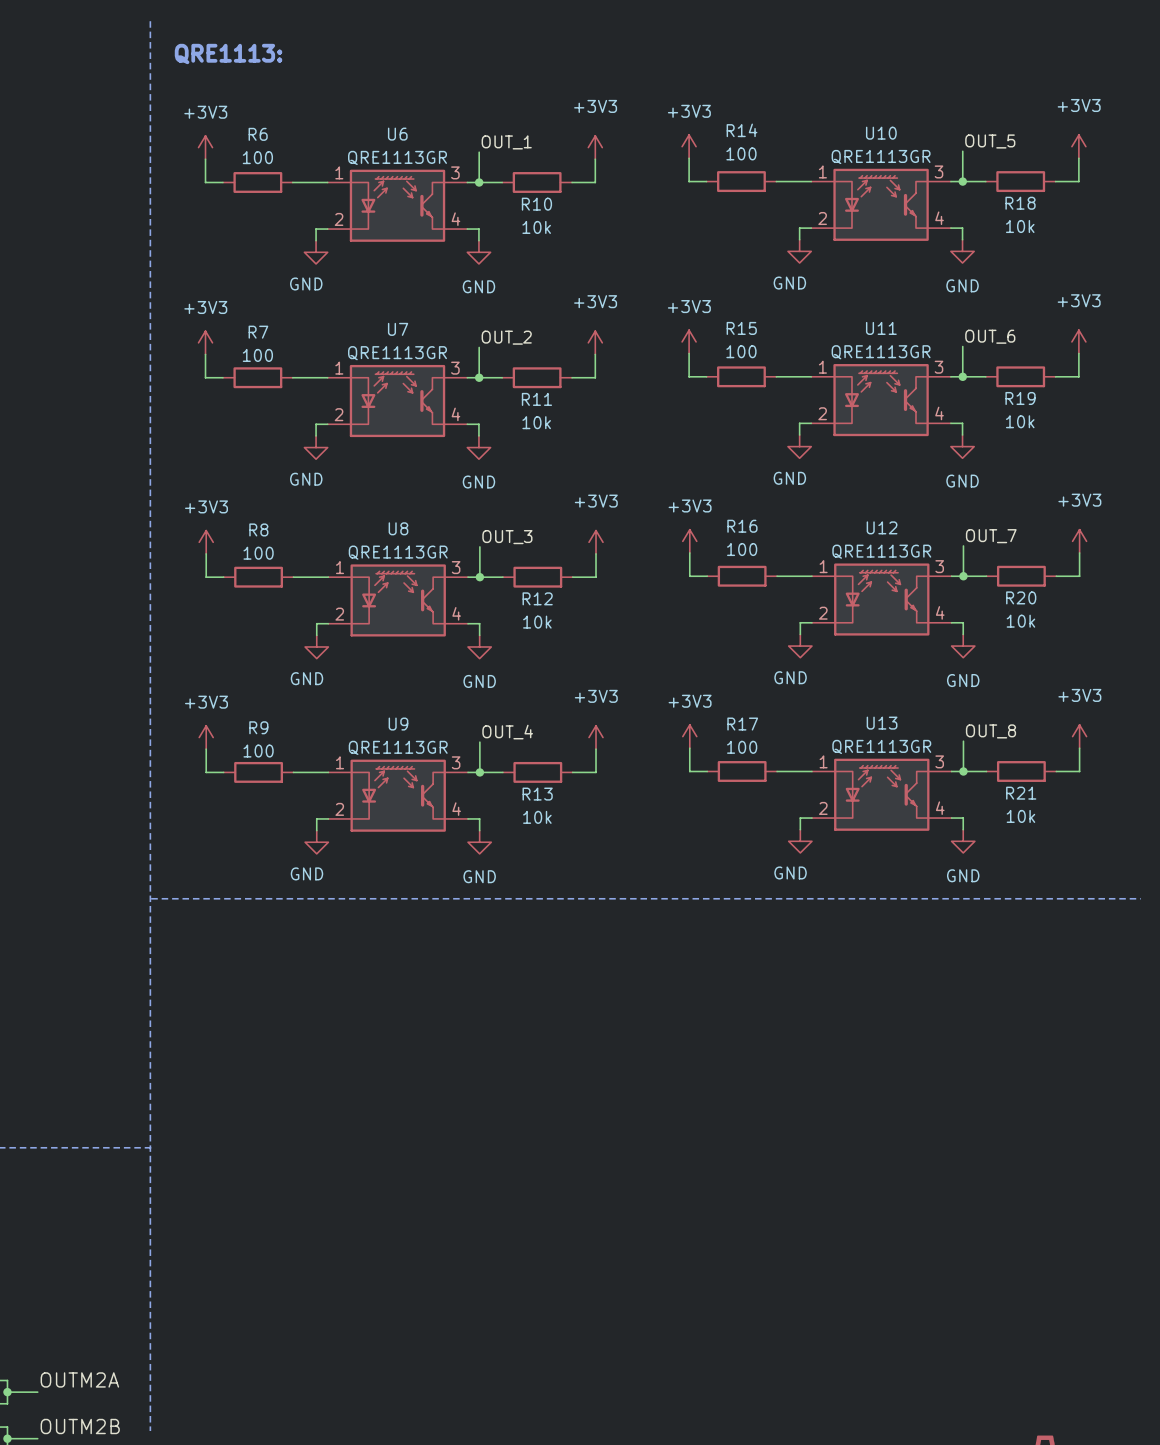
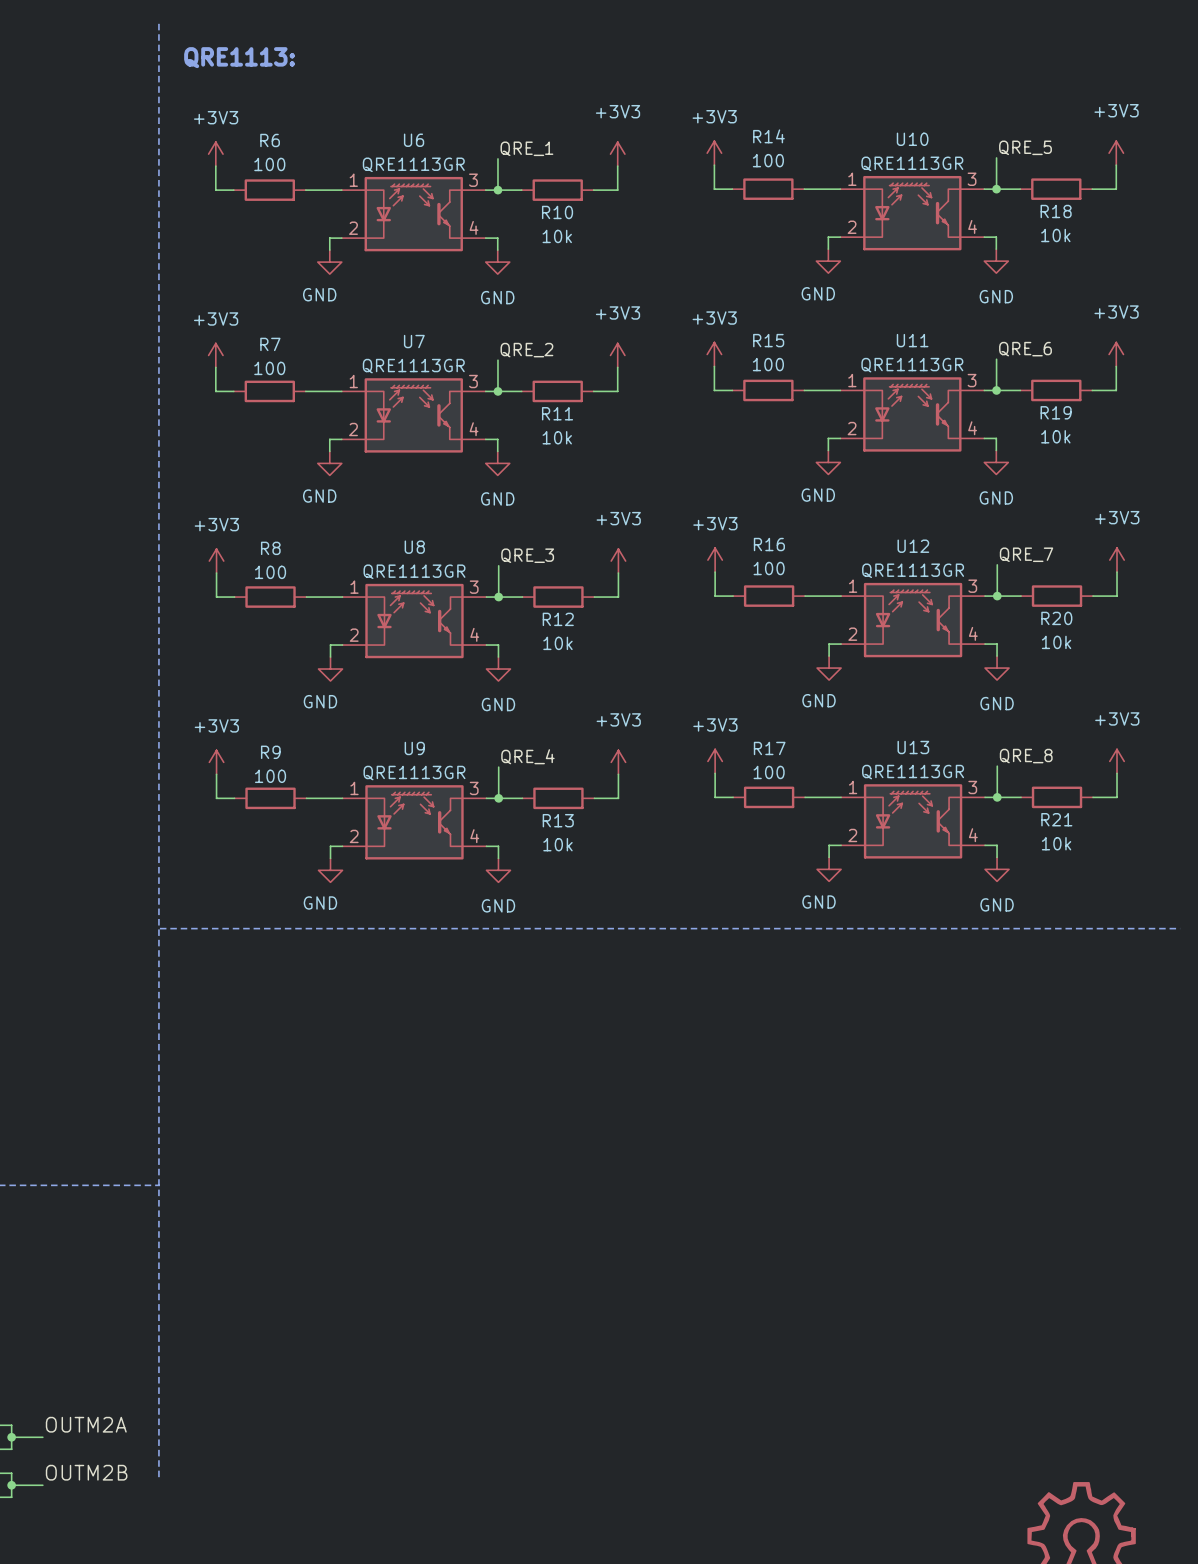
label: OUT_5 (990, 141) -> QRE_5 (1025, 147)
label: OUT_1 (506, 142) -> QRE_1 (526, 148)
label: OUT_6 (990, 336) -> QRE_6 (1025, 349)
label: OUT_2 (506, 337) -> QRE_2 (526, 350)
label: OUT_7 (991, 536) -> QRE_7 (1026, 554)
label: OUT_3 (507, 537) -> QRE_3 (527, 555)
label: OUT_8 (990, 731) -> QRE_8 (1026, 756)
label: OUT_4 (507, 732) -> QRE_4 (527, 756)

